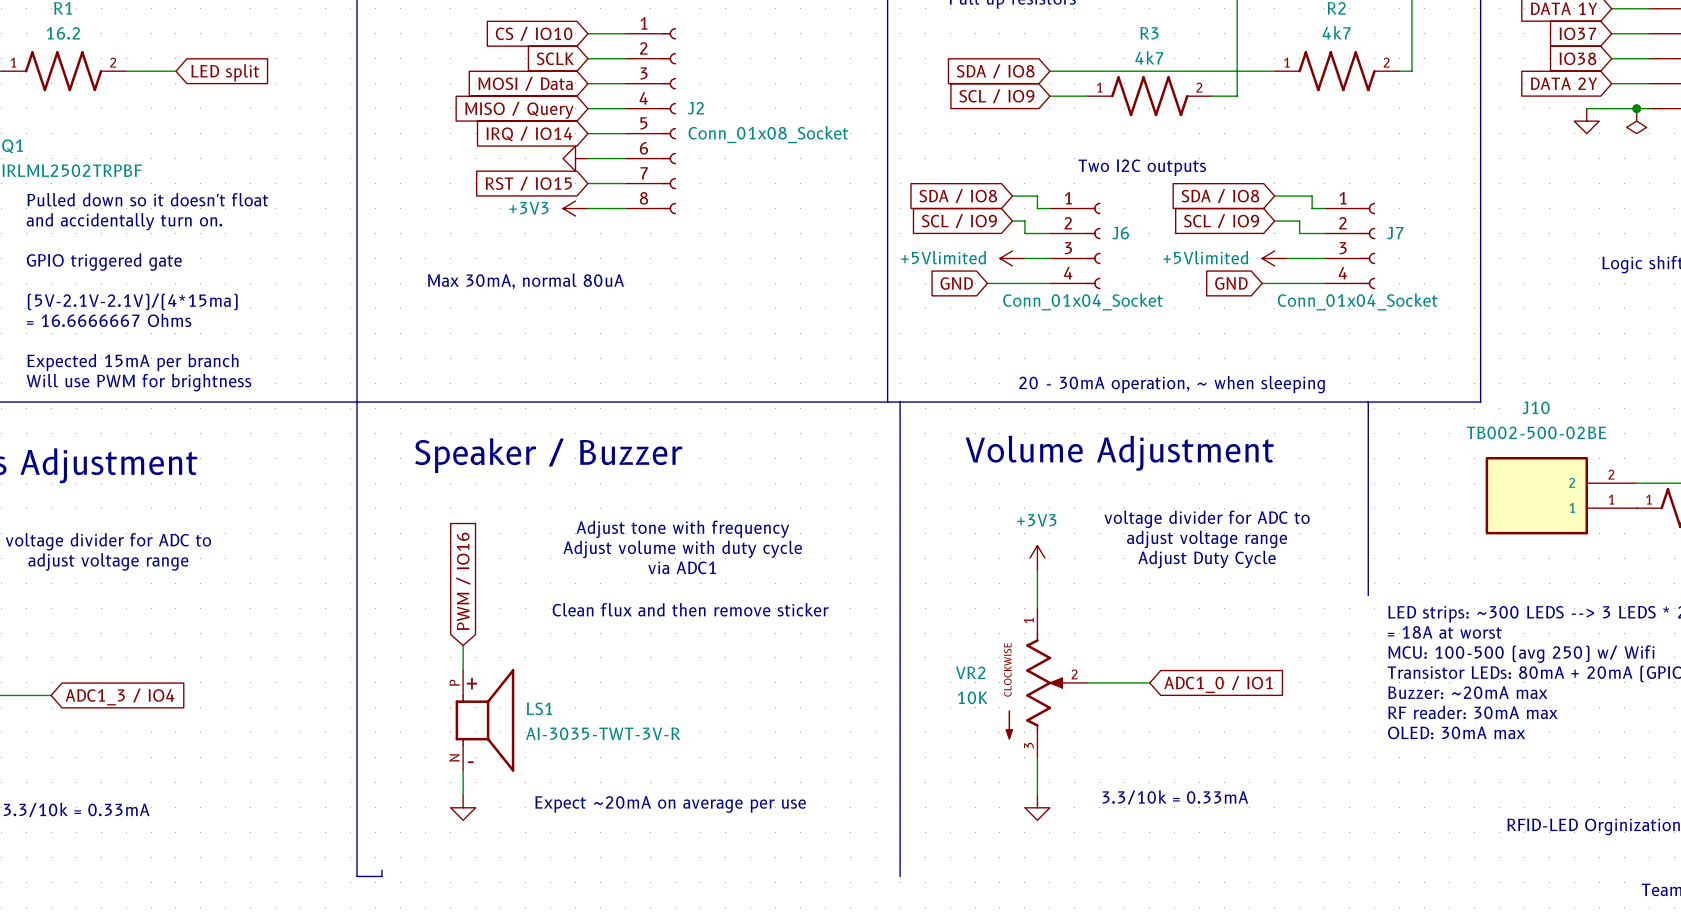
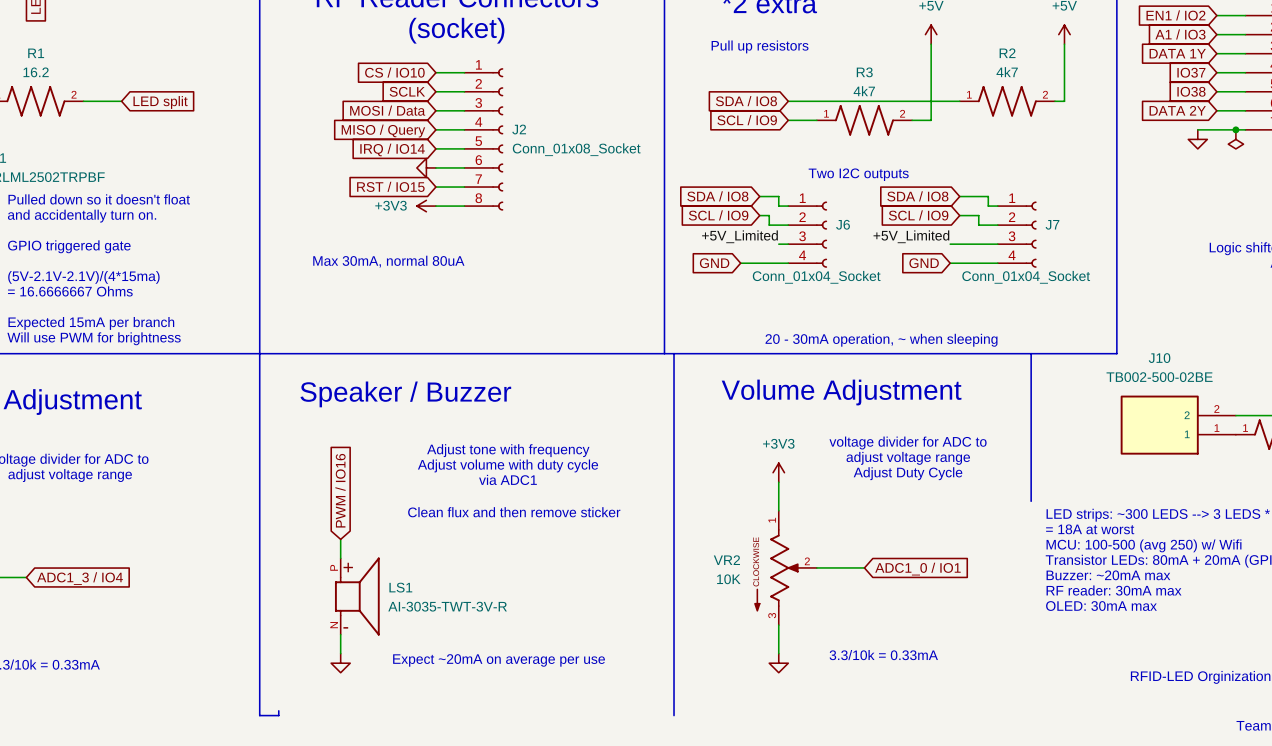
label: none -> +5V_Limited (739, 236)
label: none -> +5V_Limited (911, 236)
power symbol: +5Vlimited (1012, 258) -> none
wire: (1024, 258) (1037, 258) -> none
power symbol: +5Vlimited (1274, 258) -> none

